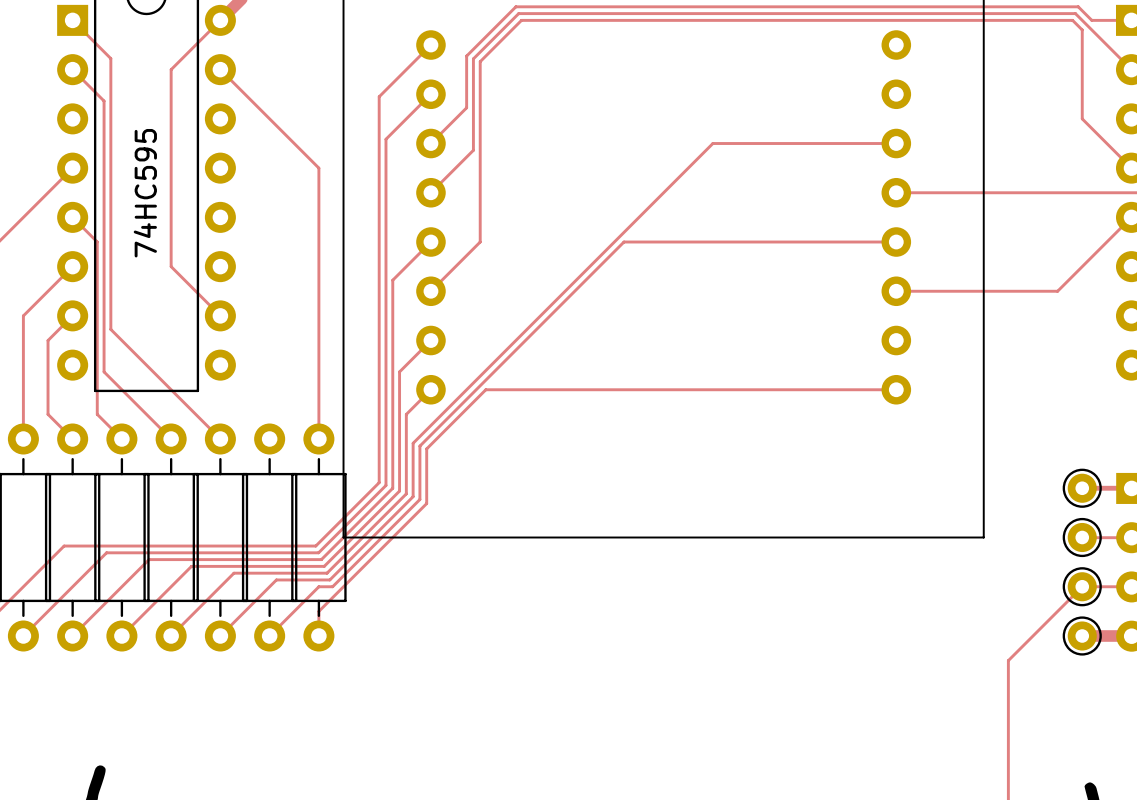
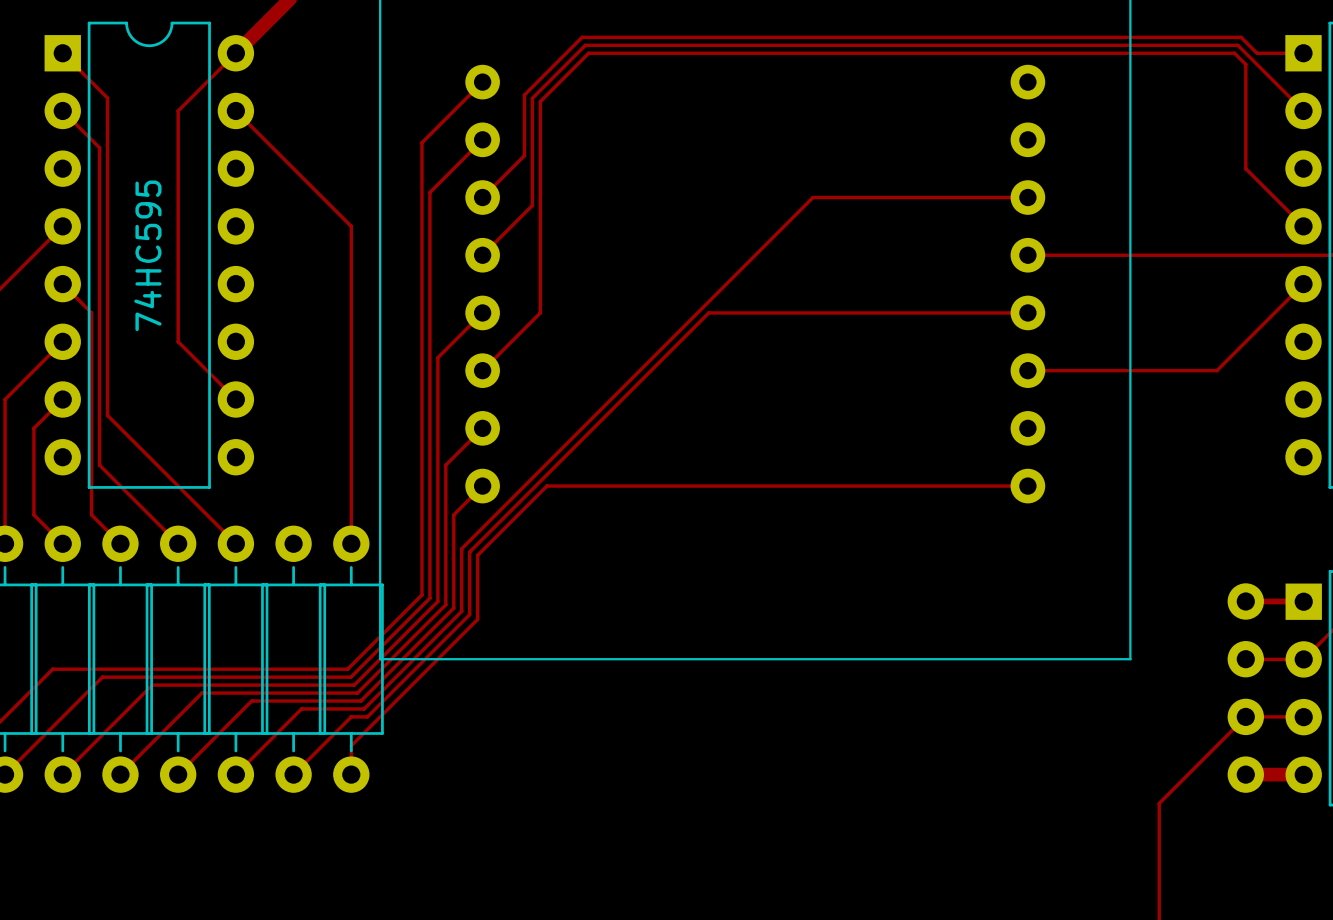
part footprint: [1062, 468, 1102, 508] -> [1227, 583, 1264, 620]
part footprint: [1062, 517, 1102, 558] -> [1227, 641, 1264, 678]
part footprint: [1062, 567, 1102, 607] -> [1227, 698, 1264, 736]
part footprint: [1062, 616, 1102, 656] -> [1227, 756, 1264, 793]

